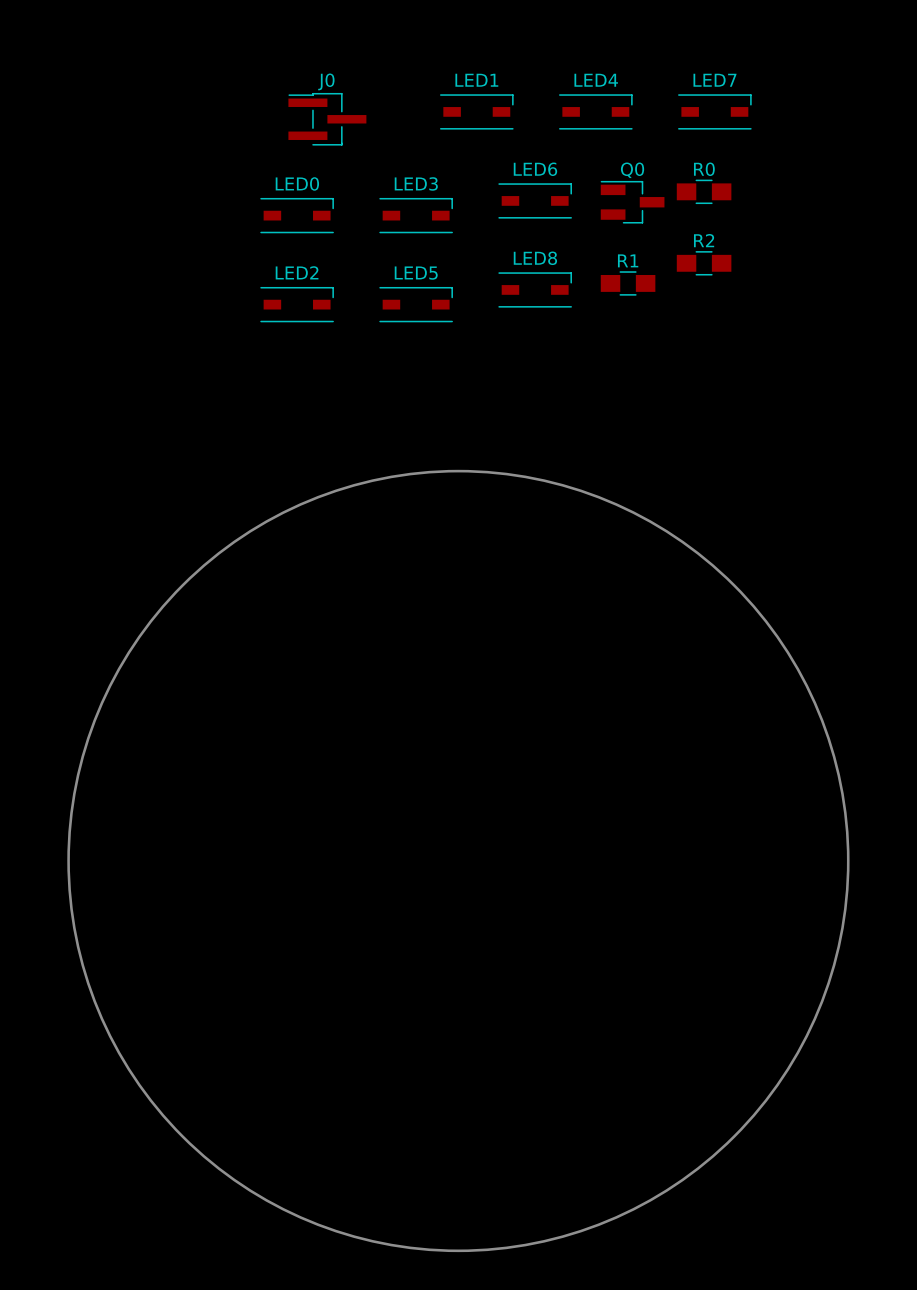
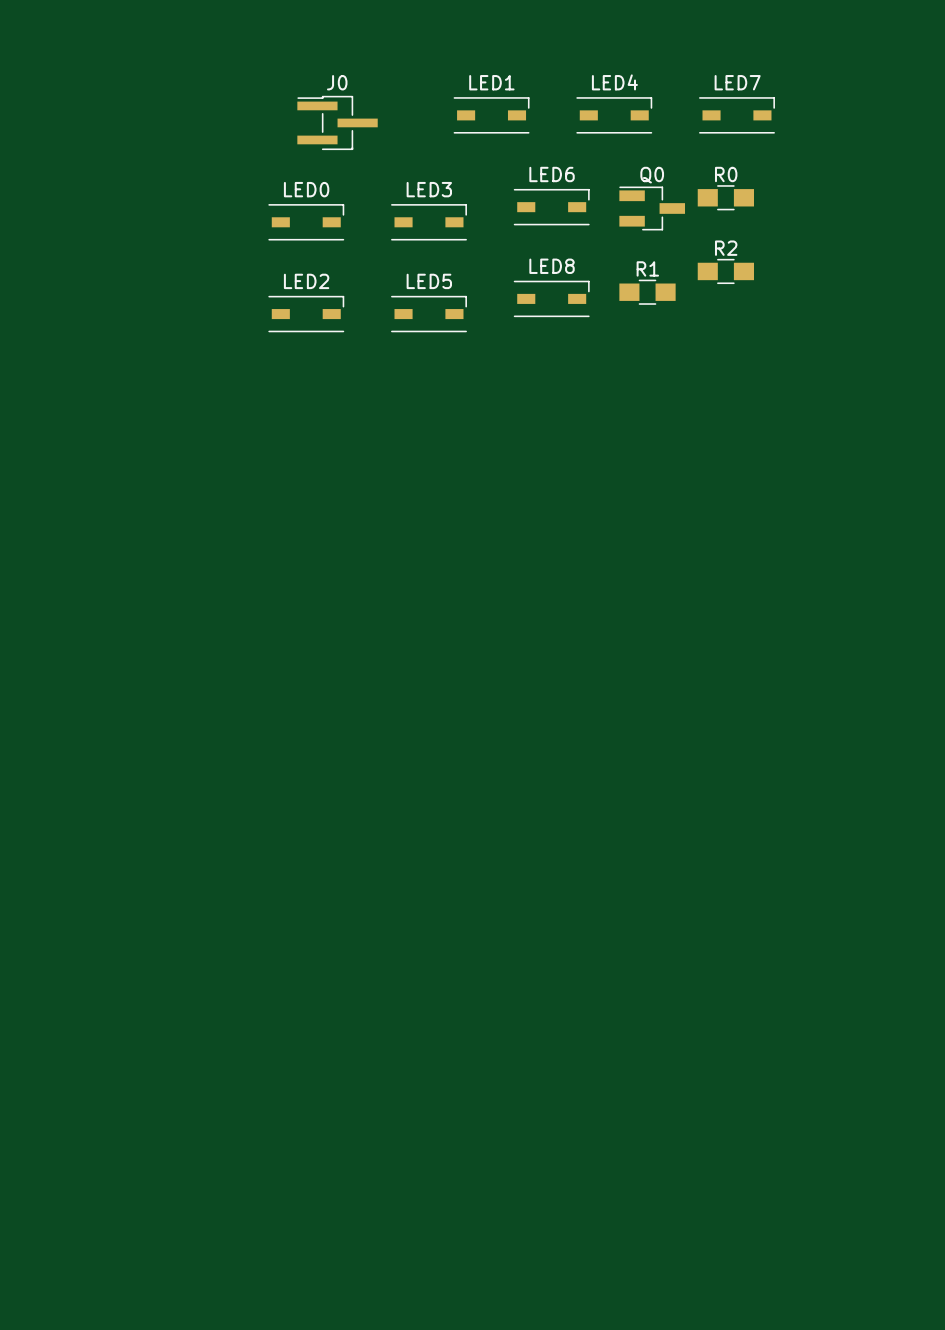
drawing: [67, 469, 850, 1253] -> none

